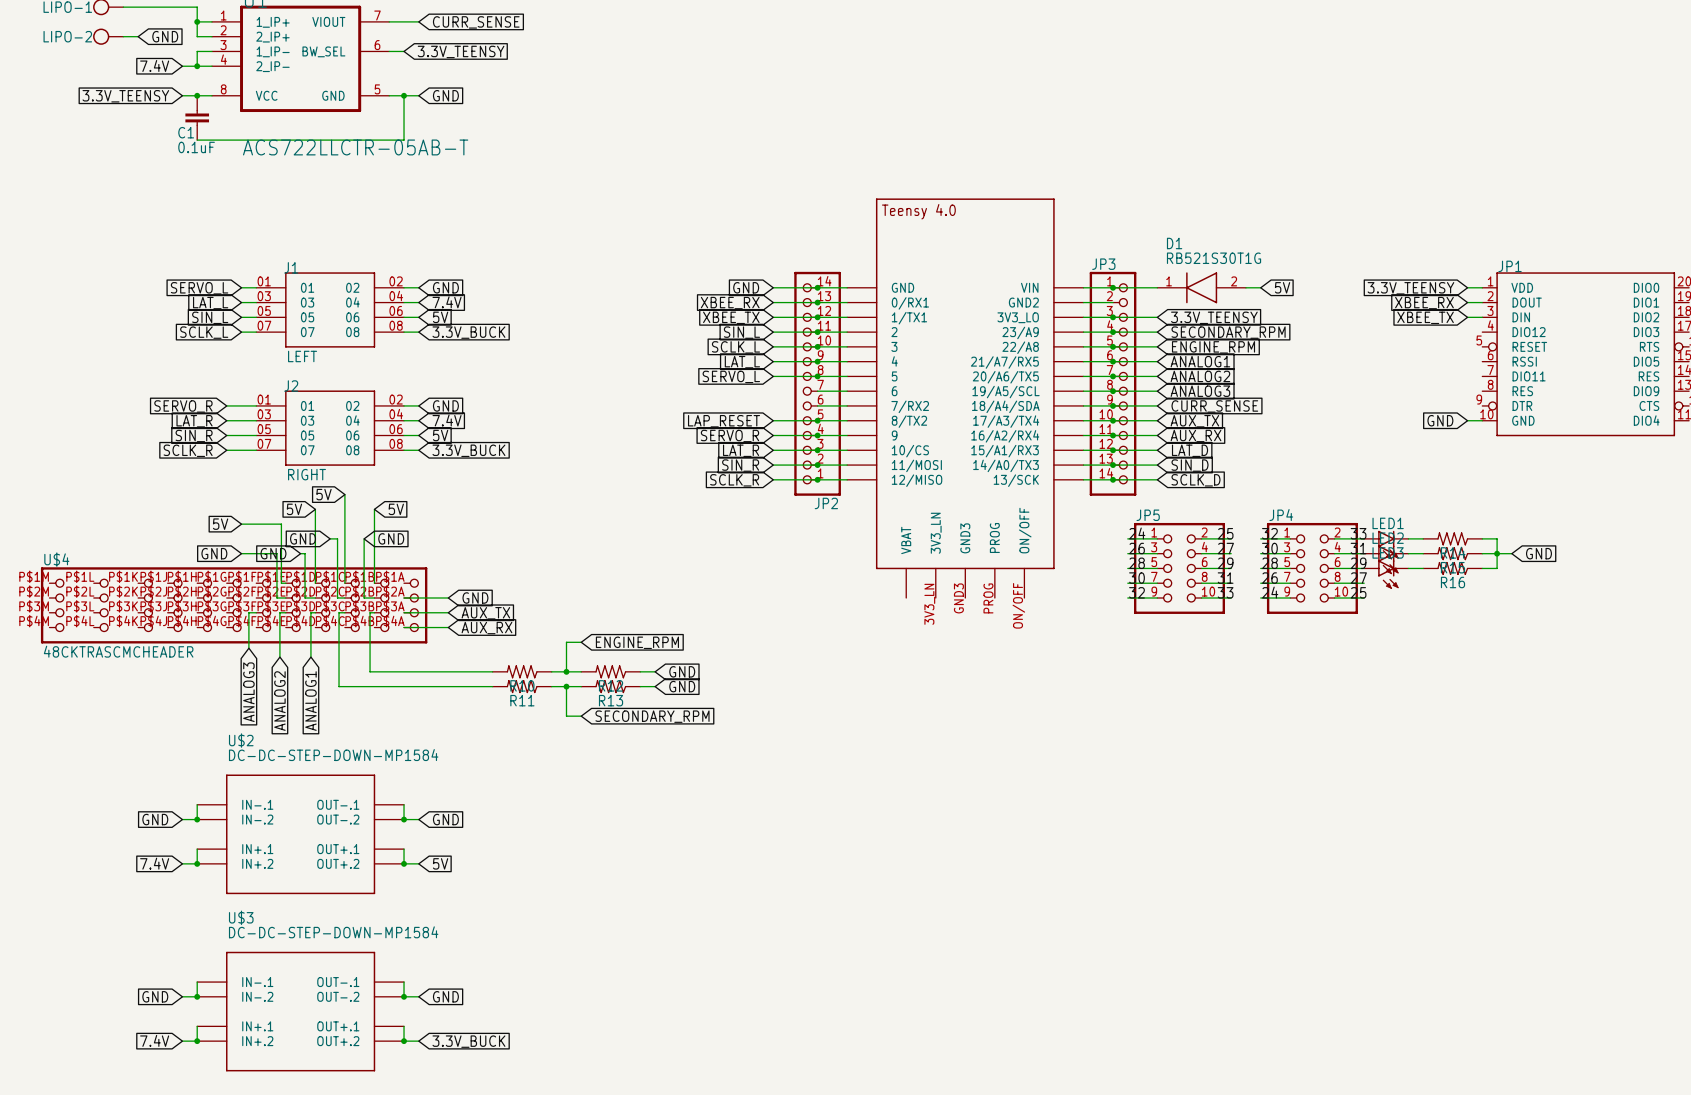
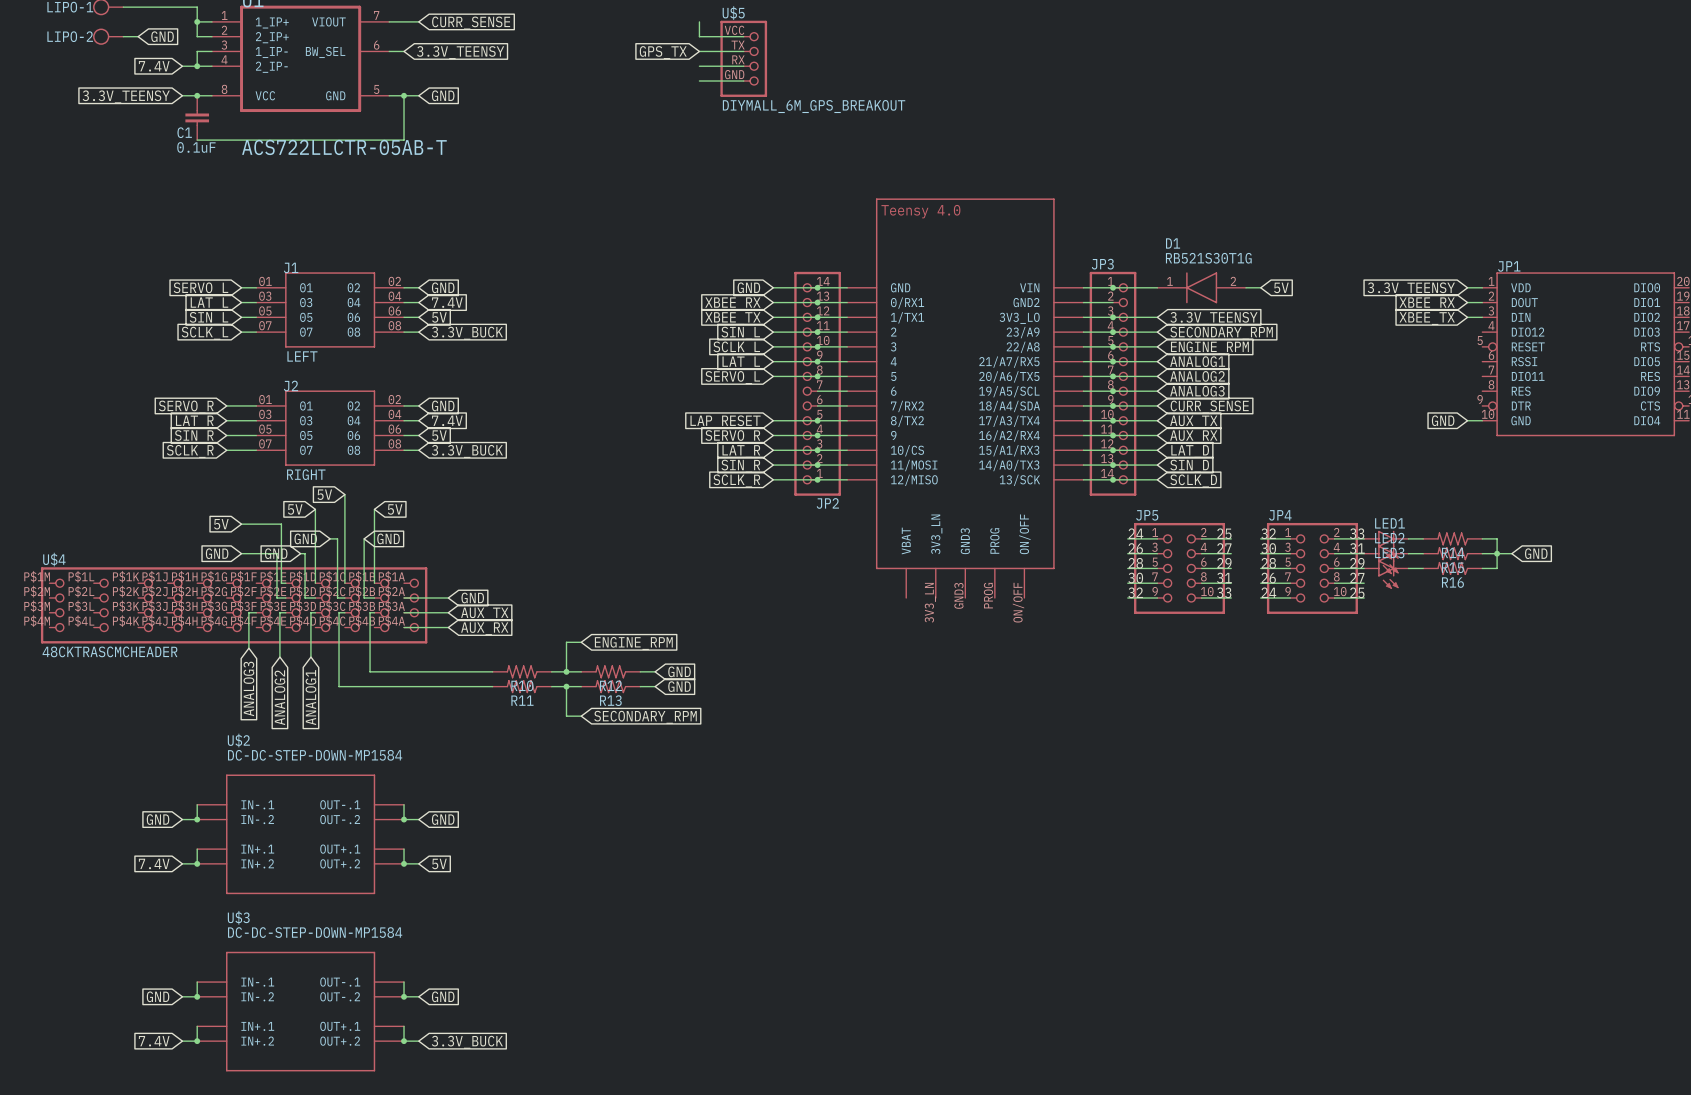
wire: none -> (699, 21) (699, 36) (743, 36)
global label: none -> GPS_TX (663, 52)
wire: none -> (699, 51) (743, 51)
U$5: none -> DIYMALL_6M_GPS_BREAKOUT (743, 58)
wire: none -> (699, 66) (743, 66)
wire: none -> (699, 81) (743, 81)

